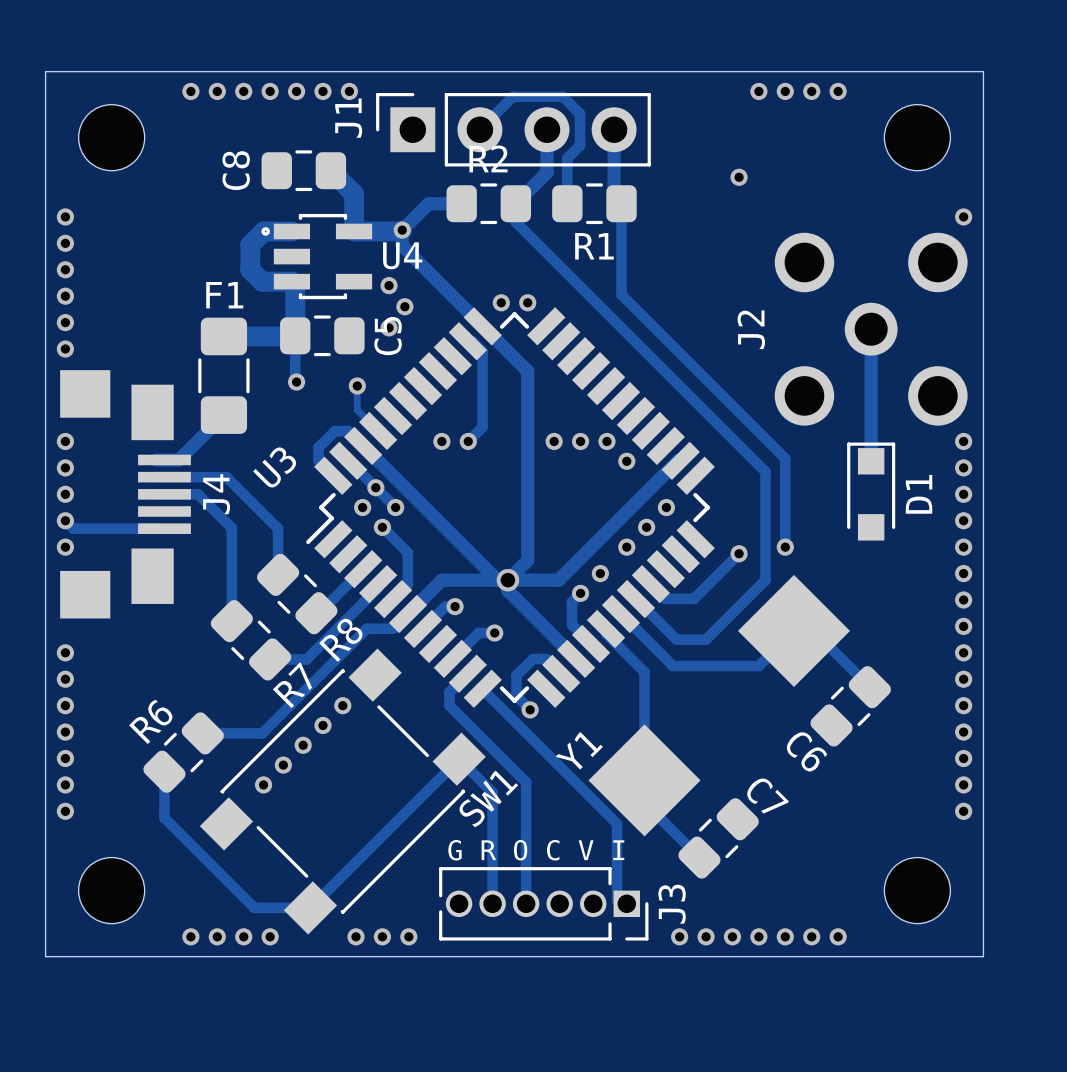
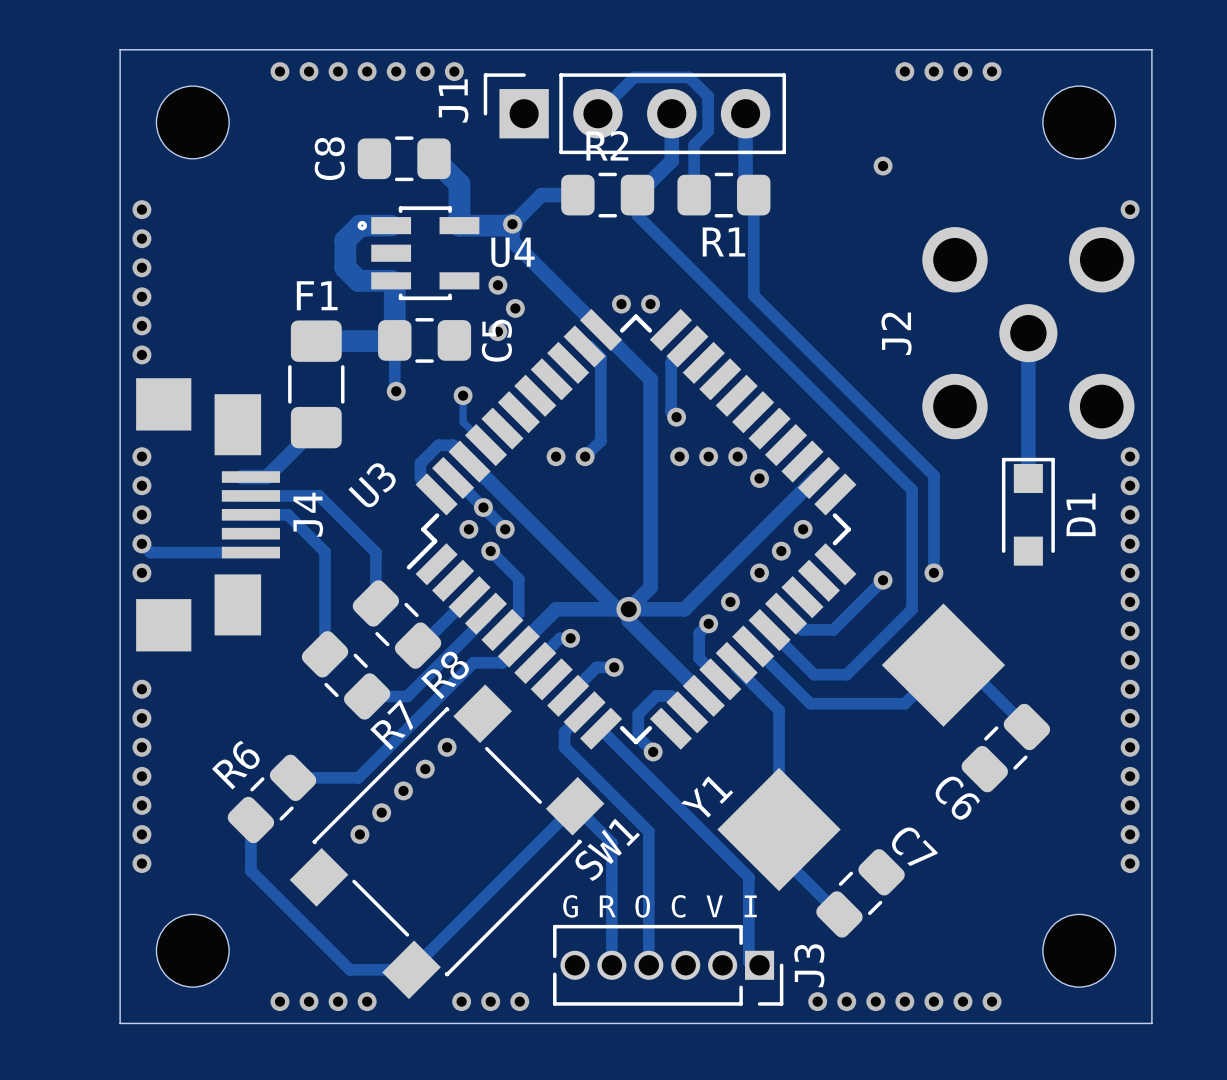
track: none -> (687, 346) (671, 362) (671, 411) (676, 417)
via: none -> (676, 417)

